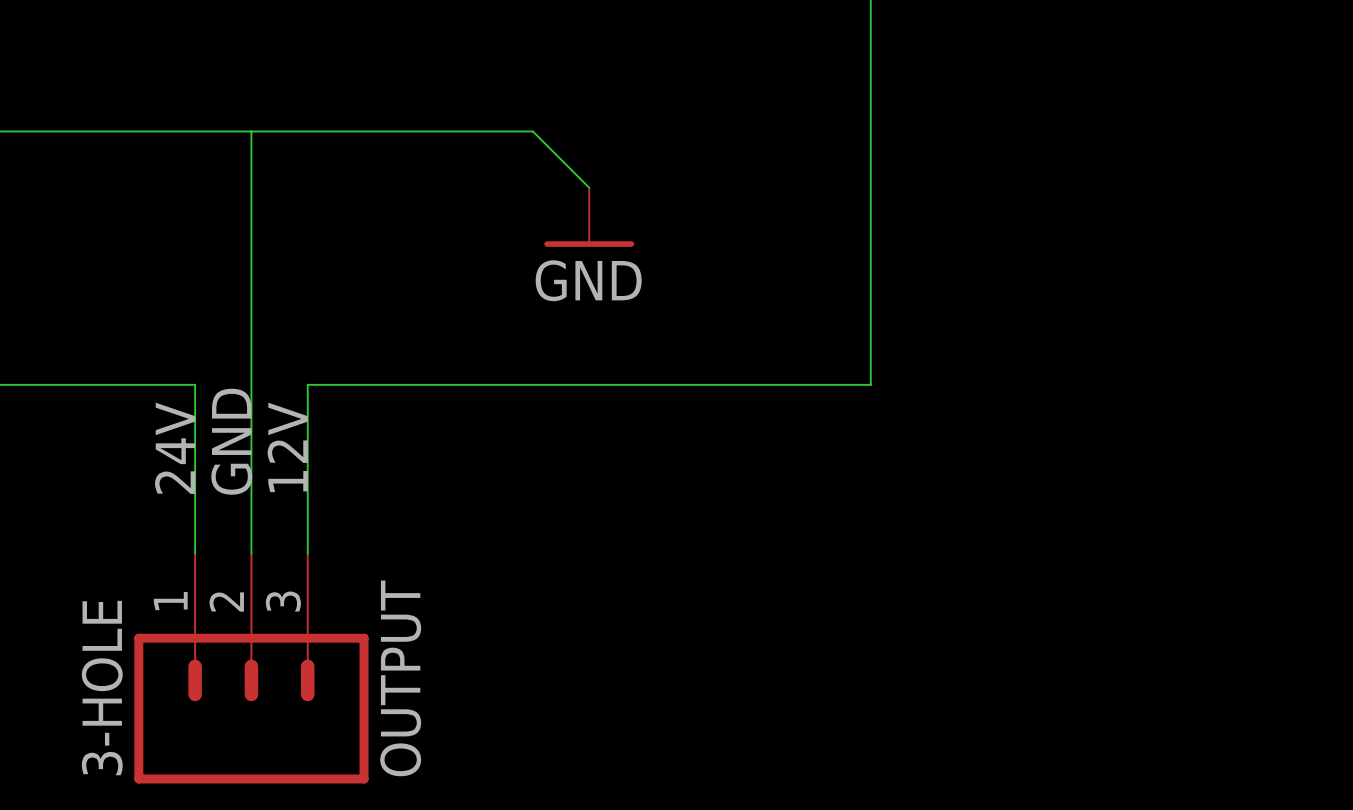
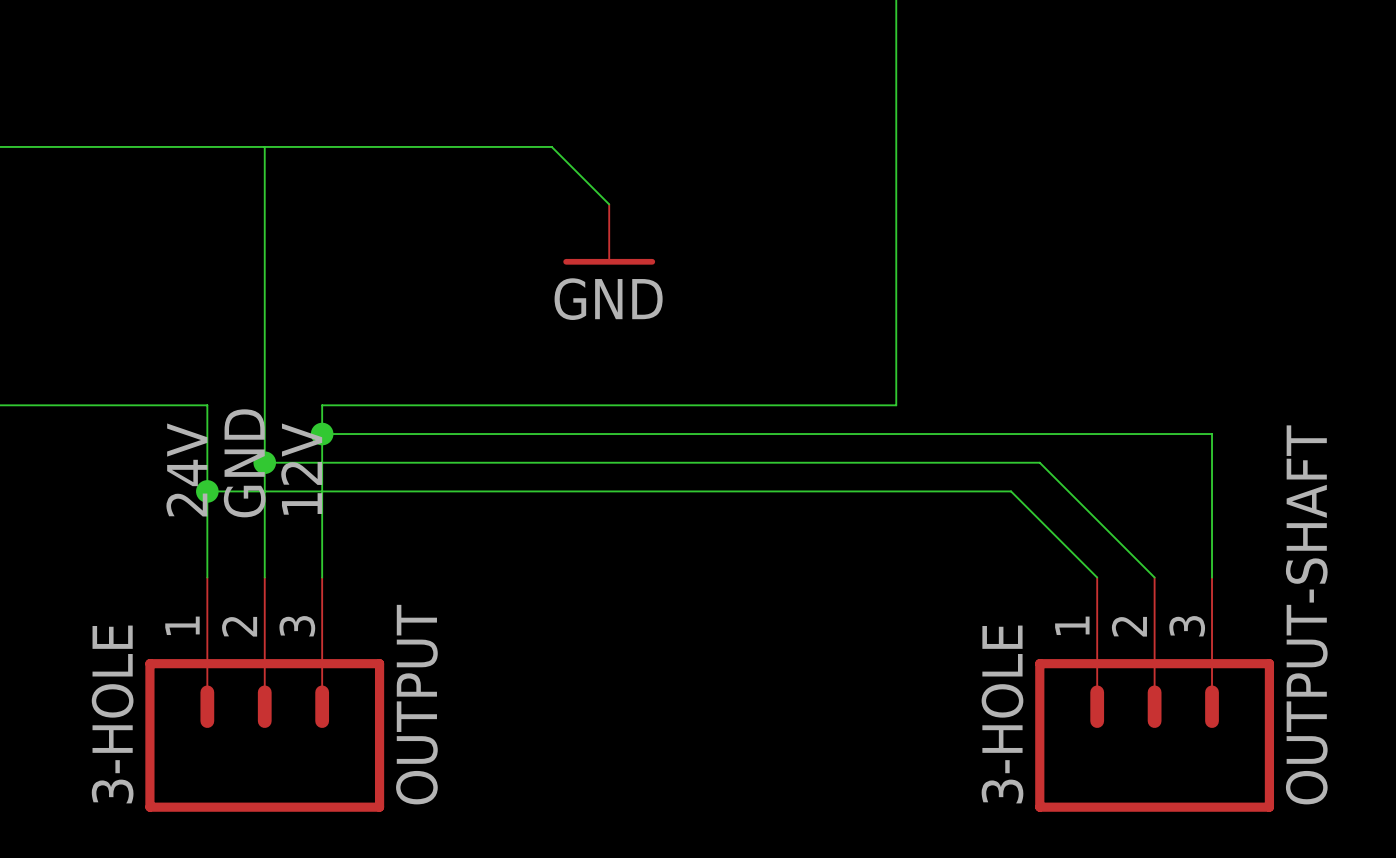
wire: none -> (322, 434) (1212, 434) (1212, 577)
junction: none -> (322, 434)
wire: none -> (264, 462) (1039, 462) (1154, 577)
junction: none -> (264, 462)
wire: none -> (207, 491) (1011, 491) (1097, 577)
junction: none -> (207, 491)
OUTPUT-SHAFT: none -> 3-HOLE (1154, 694)

